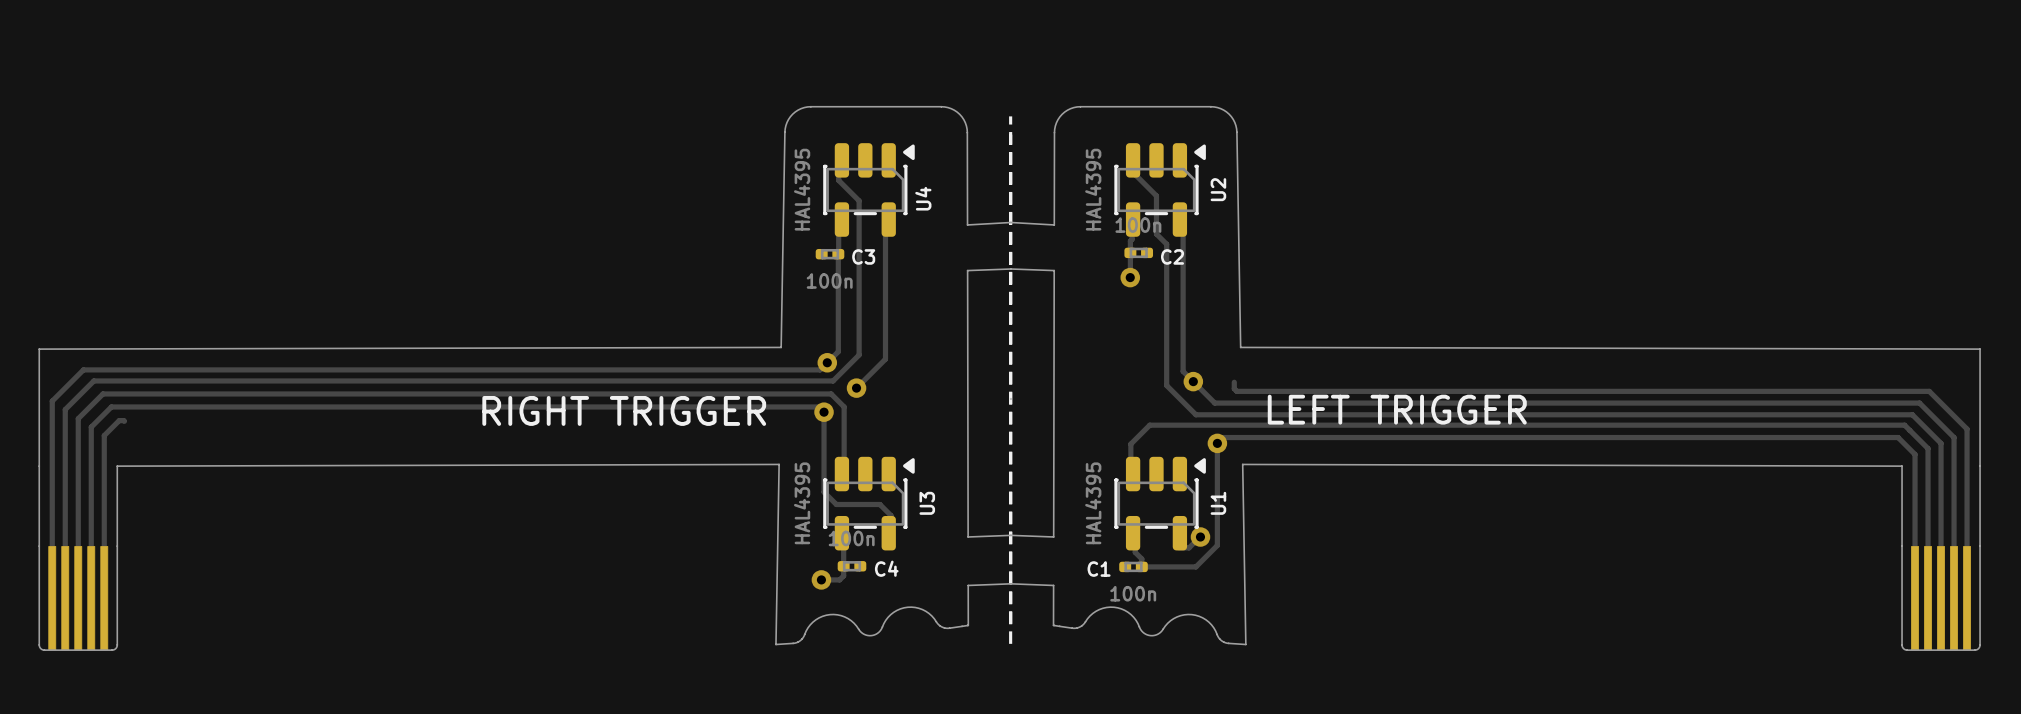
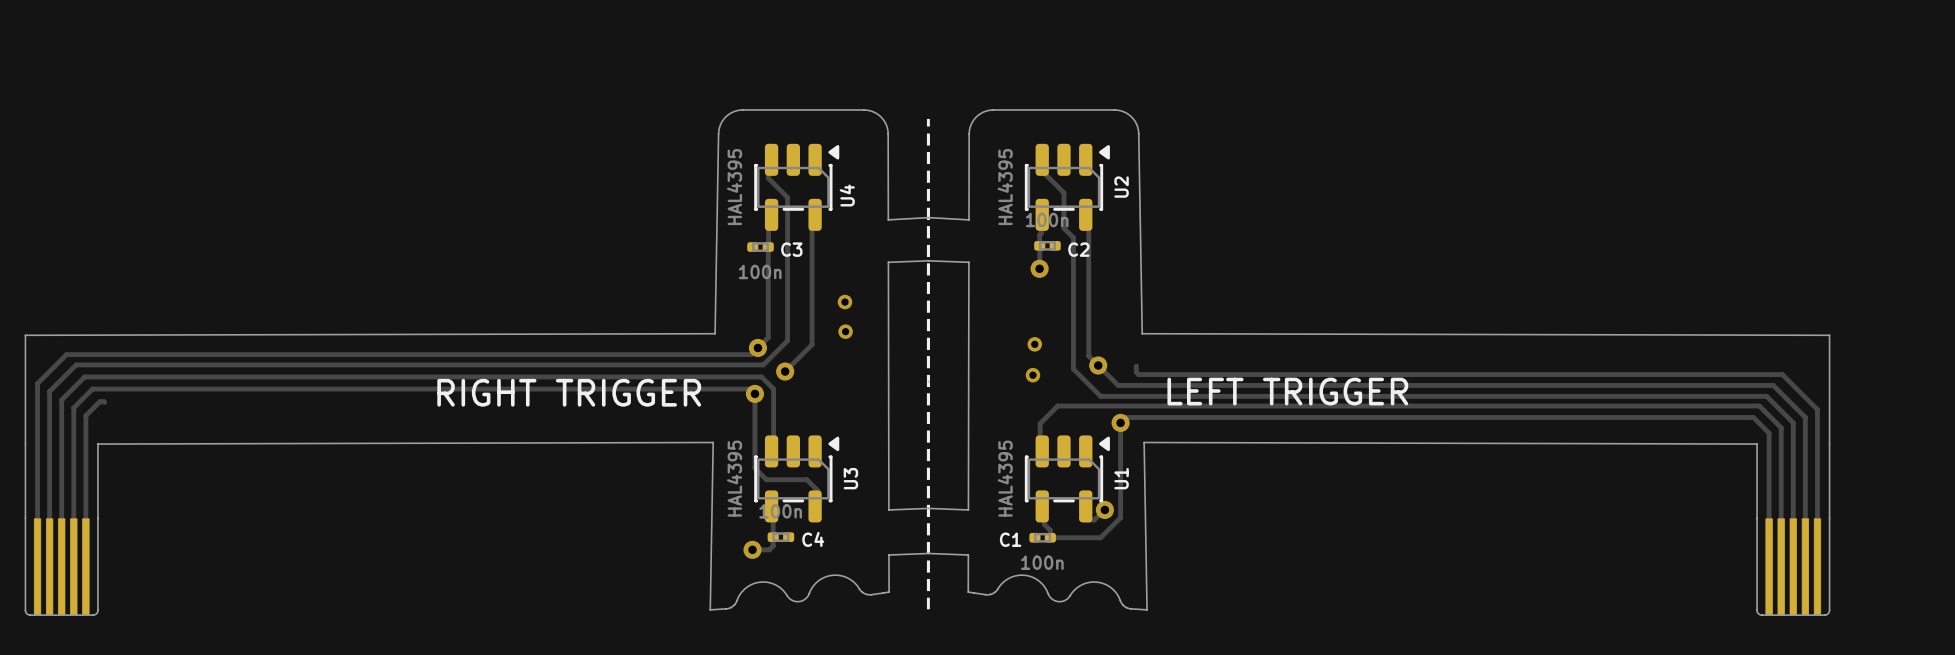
via: none -> (845, 302)
via: none -> (845, 331)
via: none -> (1034, 344)
via: none -> (1032, 375)

